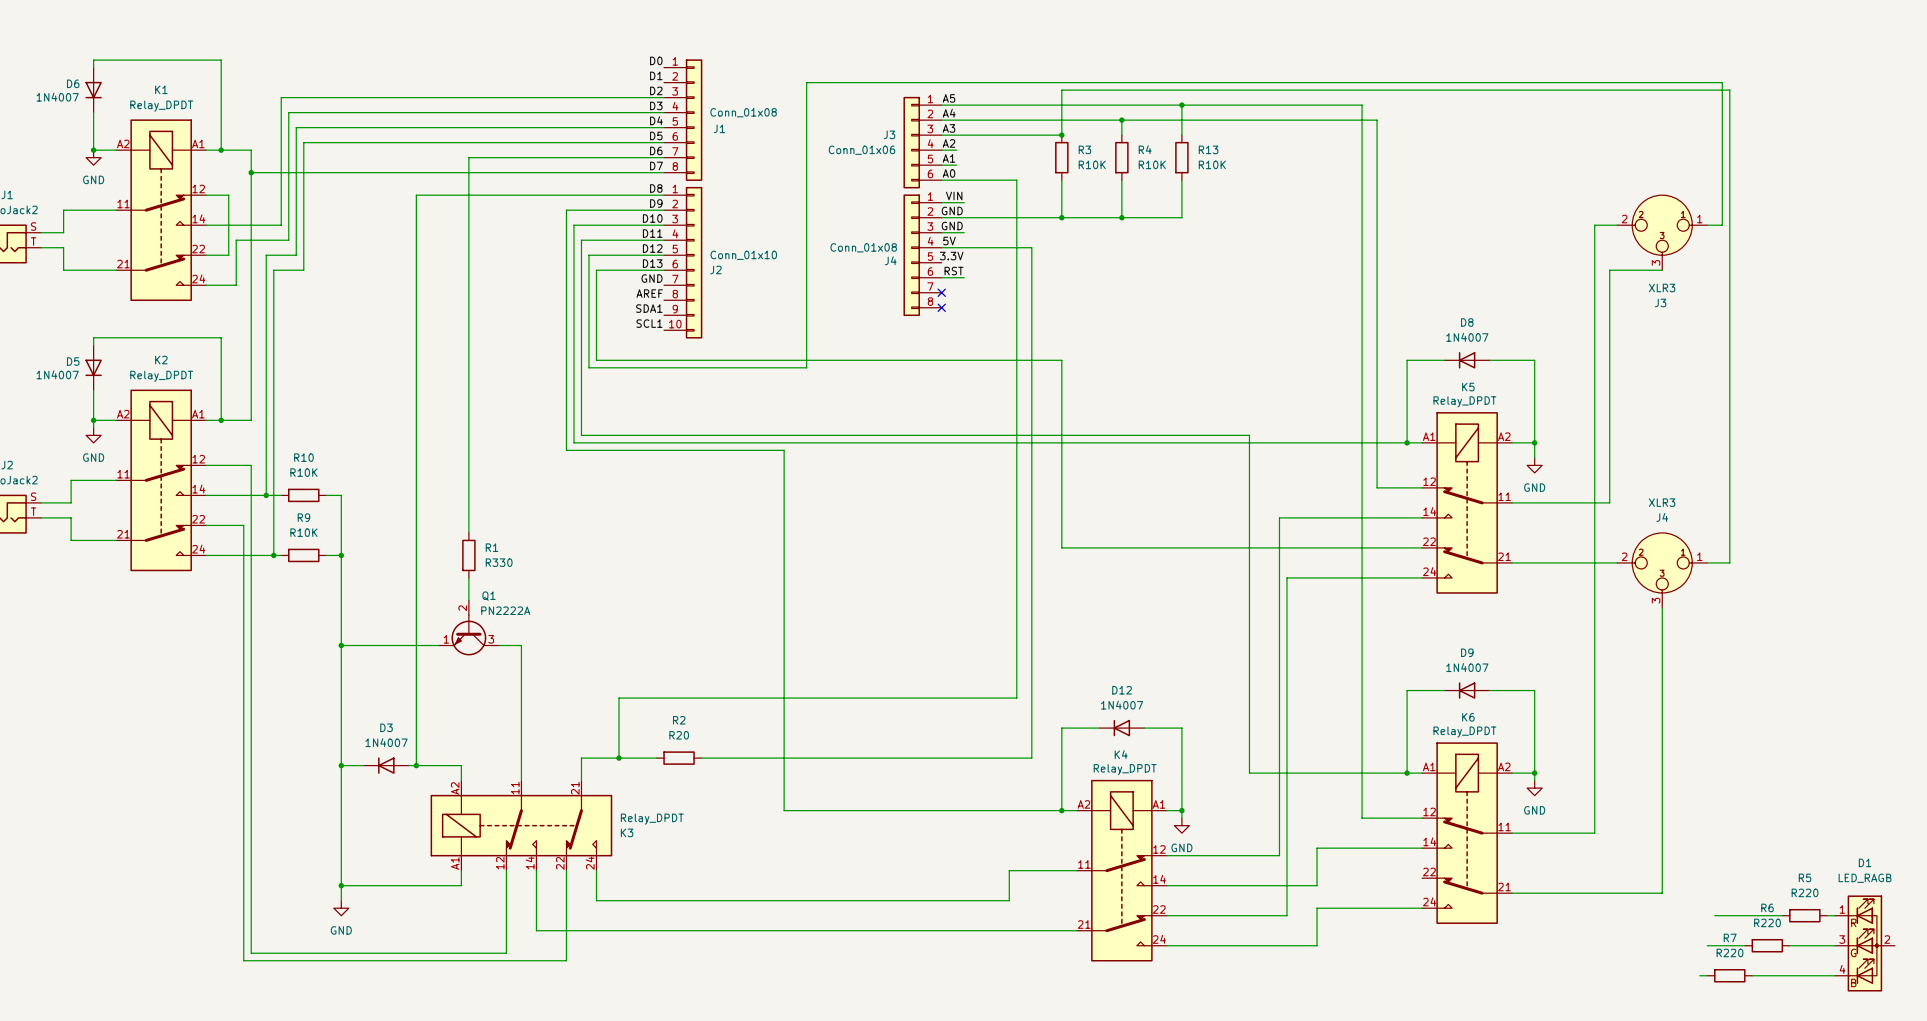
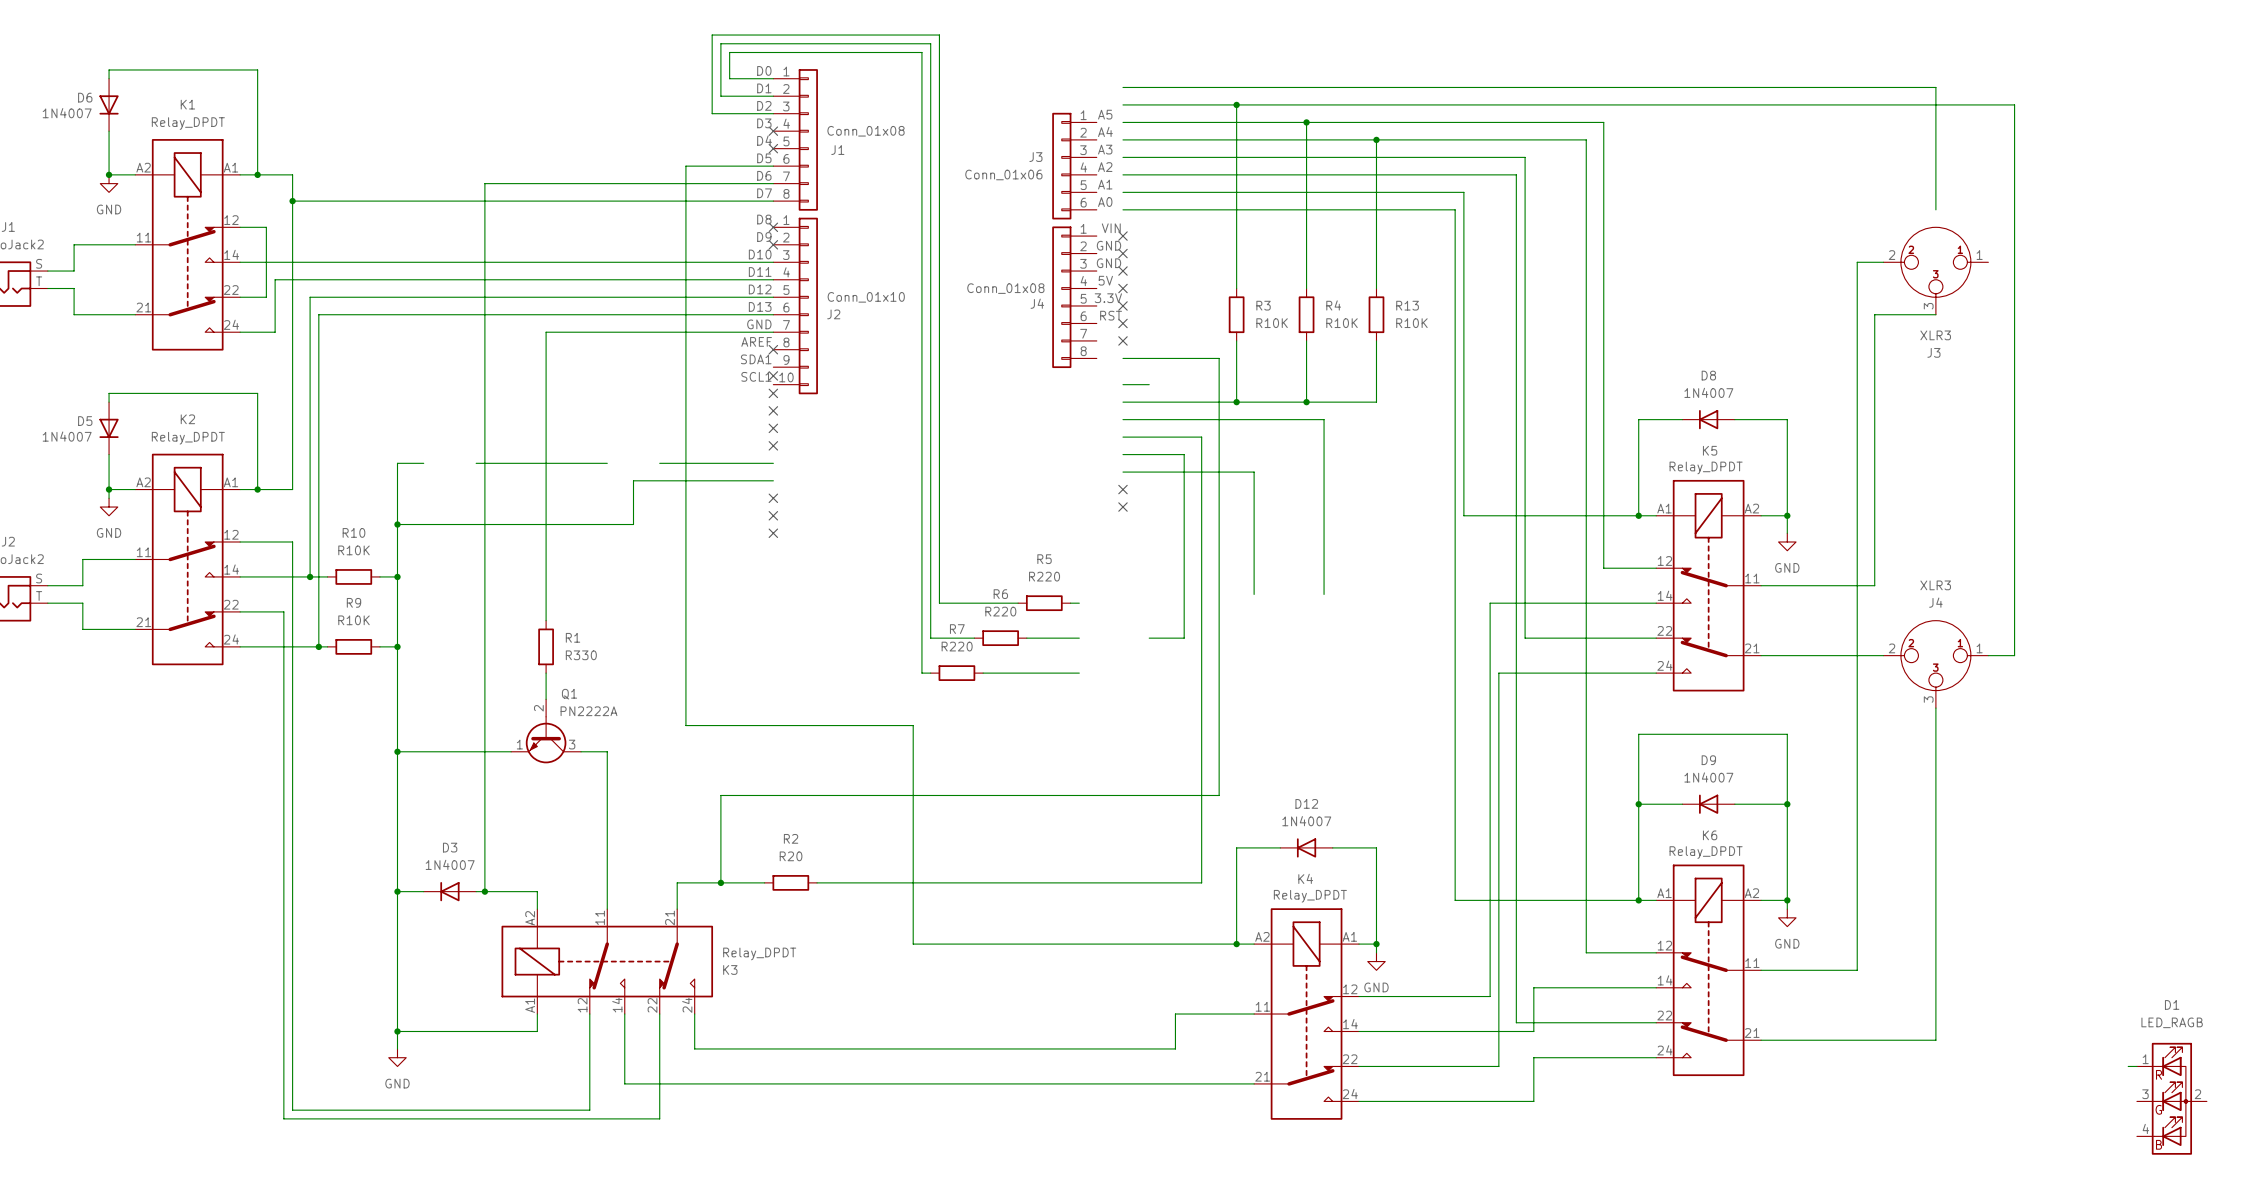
wire: none -> (773, 78) (729, 78) (729, 52) (921, 52) (921, 673) (930, 673)
wire: none -> (1122, 87) (1935, 87) (1935, 209)
wire: none -> (773, 96) (720, 96) (720, 43) (930, 43) (930, 638) (974, 638)
wire: (806, 82) (1722, 82) (1722, 225) (1707, 225) -> (939, 96) (939, 35) (712, 35) (712, 113)
wire: none -> (1122, 104) (1236, 104)
junction: none -> (1236, 104)
wire: (611, 97) (281, 97) (281, 225) -> (668, 262) (327, 262)
wire: (941, 105) (964, 105) -> none
wire: (1181, 105) (1181, 120) -> (1306, 122) (1306, 139)
junction position: (1181, 105) -> (1376, 139)
wire: (1362, 105) (1362, 120) (1377, 120) -> (1586, 122) (1603, 122) (1603, 139)
wire: (664, 112) (288, 112) (288, 240) -> (677, 279) (336, 279)
no-connect mark: none -> (773, 131)
wire: (941, 120) (964, 120) -> none
junction position: (1121, 120) -> (1306, 122)
wire: (664, 127) (296, 127) (296, 255) -> none
no-connect mark: none -> (773, 148)
wire: (941, 135) (964, 135) -> none
junction: (1061, 135) -> none
wire: none -> (1306, 157) (1306, 209)
wire: none -> (1376, 157) (1376, 209)
wire: (588, 142) (303, 142) (303, 270) -> (685, 166) (685, 297) (345, 297)
wire: (941, 150) (956, 150) -> none
wire: none -> (1122, 174) (1516, 174) (1516, 1022) (1656, 1022)
wire: (468, 157) (468, 285) -> (546, 183) (484, 183) (484, 227)
R3 position: (1061, 157) -> (1236, 314)
R4 position: (1121, 157) -> (1306, 314)
R13 position: (1181, 157) -> (1376, 314)
wire: (941, 165) (956, 165) -> none
wire: (941, 180) (964, 180) -> none
wire: (1016, 180) (1016, 390) -> (1122, 454) (1184, 454)
wire: none -> (1236, 209) (1236, 157) (1525, 157) (1525, 638)
wire: (416, 195) (664, 195) -> none
no-connect mark: none -> (773, 227)
wire: (941, 202) (964, 202) -> none
no-connect mark: none -> (1122, 236)
wire: (664, 210) (566, 210) (566, 450) (784, 450) (784, 622) -> (685, 428) (685, 725) (913, 725)
no-connect mark: none -> (773, 244)
wire: (941, 217) (1181, 217) -> (1376, 288) (1376, 253)
no-connect mark: none -> (1122, 253)
wire: none -> (1236, 253) (1236, 288)
junction: (1061, 217) -> none
wire: none -> (1306, 253) (1306, 288)
junction: (1121, 217) -> none
wire: (573, 225) (573, 442) (1256, 442) -> (1122, 192) (1463, 192) (1463, 515)
wire: (941, 232) (964, 232) -> none
no-connect mark: none -> (1122, 271)
wire: (581, 240) (581, 435) (1249, 435) -> (1184, 209) (1455, 209) (1455, 507)
wire: (941, 247) (1031, 247) (1031, 375) -> (1122, 437) (1201, 437)
no-connect mark: none -> (1122, 288)
no-connect mark: none -> (1122, 305)
wire: (596, 270) (596, 360) (964, 360) -> (694, 314) (353, 314)
wire: (941, 277) (964, 277) -> (1122, 384) (1149, 384)
no-connect mark: none -> (1122, 323)
wire: none -> (546, 332) (773, 332)
no-connect mark: (941, 292) -> none
no-connect mark: none -> (1122, 340)
wire: none -> (1236, 340) (1236, 402)
wire: none -> (1306, 340) (1306, 402)
wire: none -> (1376, 340) (1376, 402) (1122, 402)
no-connect mark: none -> (773, 349)
no-connect mark: (941, 307) -> none
no-connect mark: none -> (773, 375)
no-connect mark: none -> (773, 393)
junction: none -> (1236, 402)
junction: none -> (1306, 402)
no-connect mark: none -> (773, 410)
wire: (1061, 360) (1061, 547) (1309, 547) -> (1236, 419) (1324, 419) (1324, 594)
wire: (588, 367) (806, 367) -> (1018, 603) (939, 603) (939, 428)
no-connect mark: none -> (773, 428)
no-connect mark: none -> (773, 445)
wire: none -> (423, 463) (397, 463) (397, 576)
wire: none -> (476, 463) (607, 463)
wire: none -> (659, 463) (773, 463)
wire: none -> (1122, 472) (1254, 472) (1254, 594)
wire: none -> (773, 480) (633, 480) (633, 524) (397, 524)
no-connect mark: none -> (1122, 489)
no-connect mark: none -> (773, 498)
no-connect mark: none -> (1122, 507)
no-connect mark: none -> (773, 515)
junction: none -> (397, 524)
no-connect mark: none -> (773, 533)
junction: none -> (397, 576)
wire: none -> (1070, 603) (1079, 603)
wire: none -> (1026, 638) (1079, 638)
wire: none -> (1149, 638) (1184, 638)
wire: (1016, 547) (1016, 698) (619, 698) -> (1122, 358) (1219, 358) (1219, 795) (720, 795) (720, 812)
wire: none -> (983, 673) (1079, 673)
wire: none -> (1638, 804) (1638, 734) (1787, 734) (1787, 804)
junction: none -> (1638, 804)
junction: none -> (1787, 804)
wire: (1714, 915) (1782, 915) -> none
R5 position: (1804, 915) -> (1044, 603)
wire: (1707, 945) (1744, 945) -> none
R6 position: (1767, 945) -> (1000, 638)
wire: (1789, 945) (1834, 945) -> none
wire: (1699, 975) (1707, 975) -> none
R7 position: (1729, 975) -> (956, 673)
wire: (1752, 975) (1834, 975) -> none

